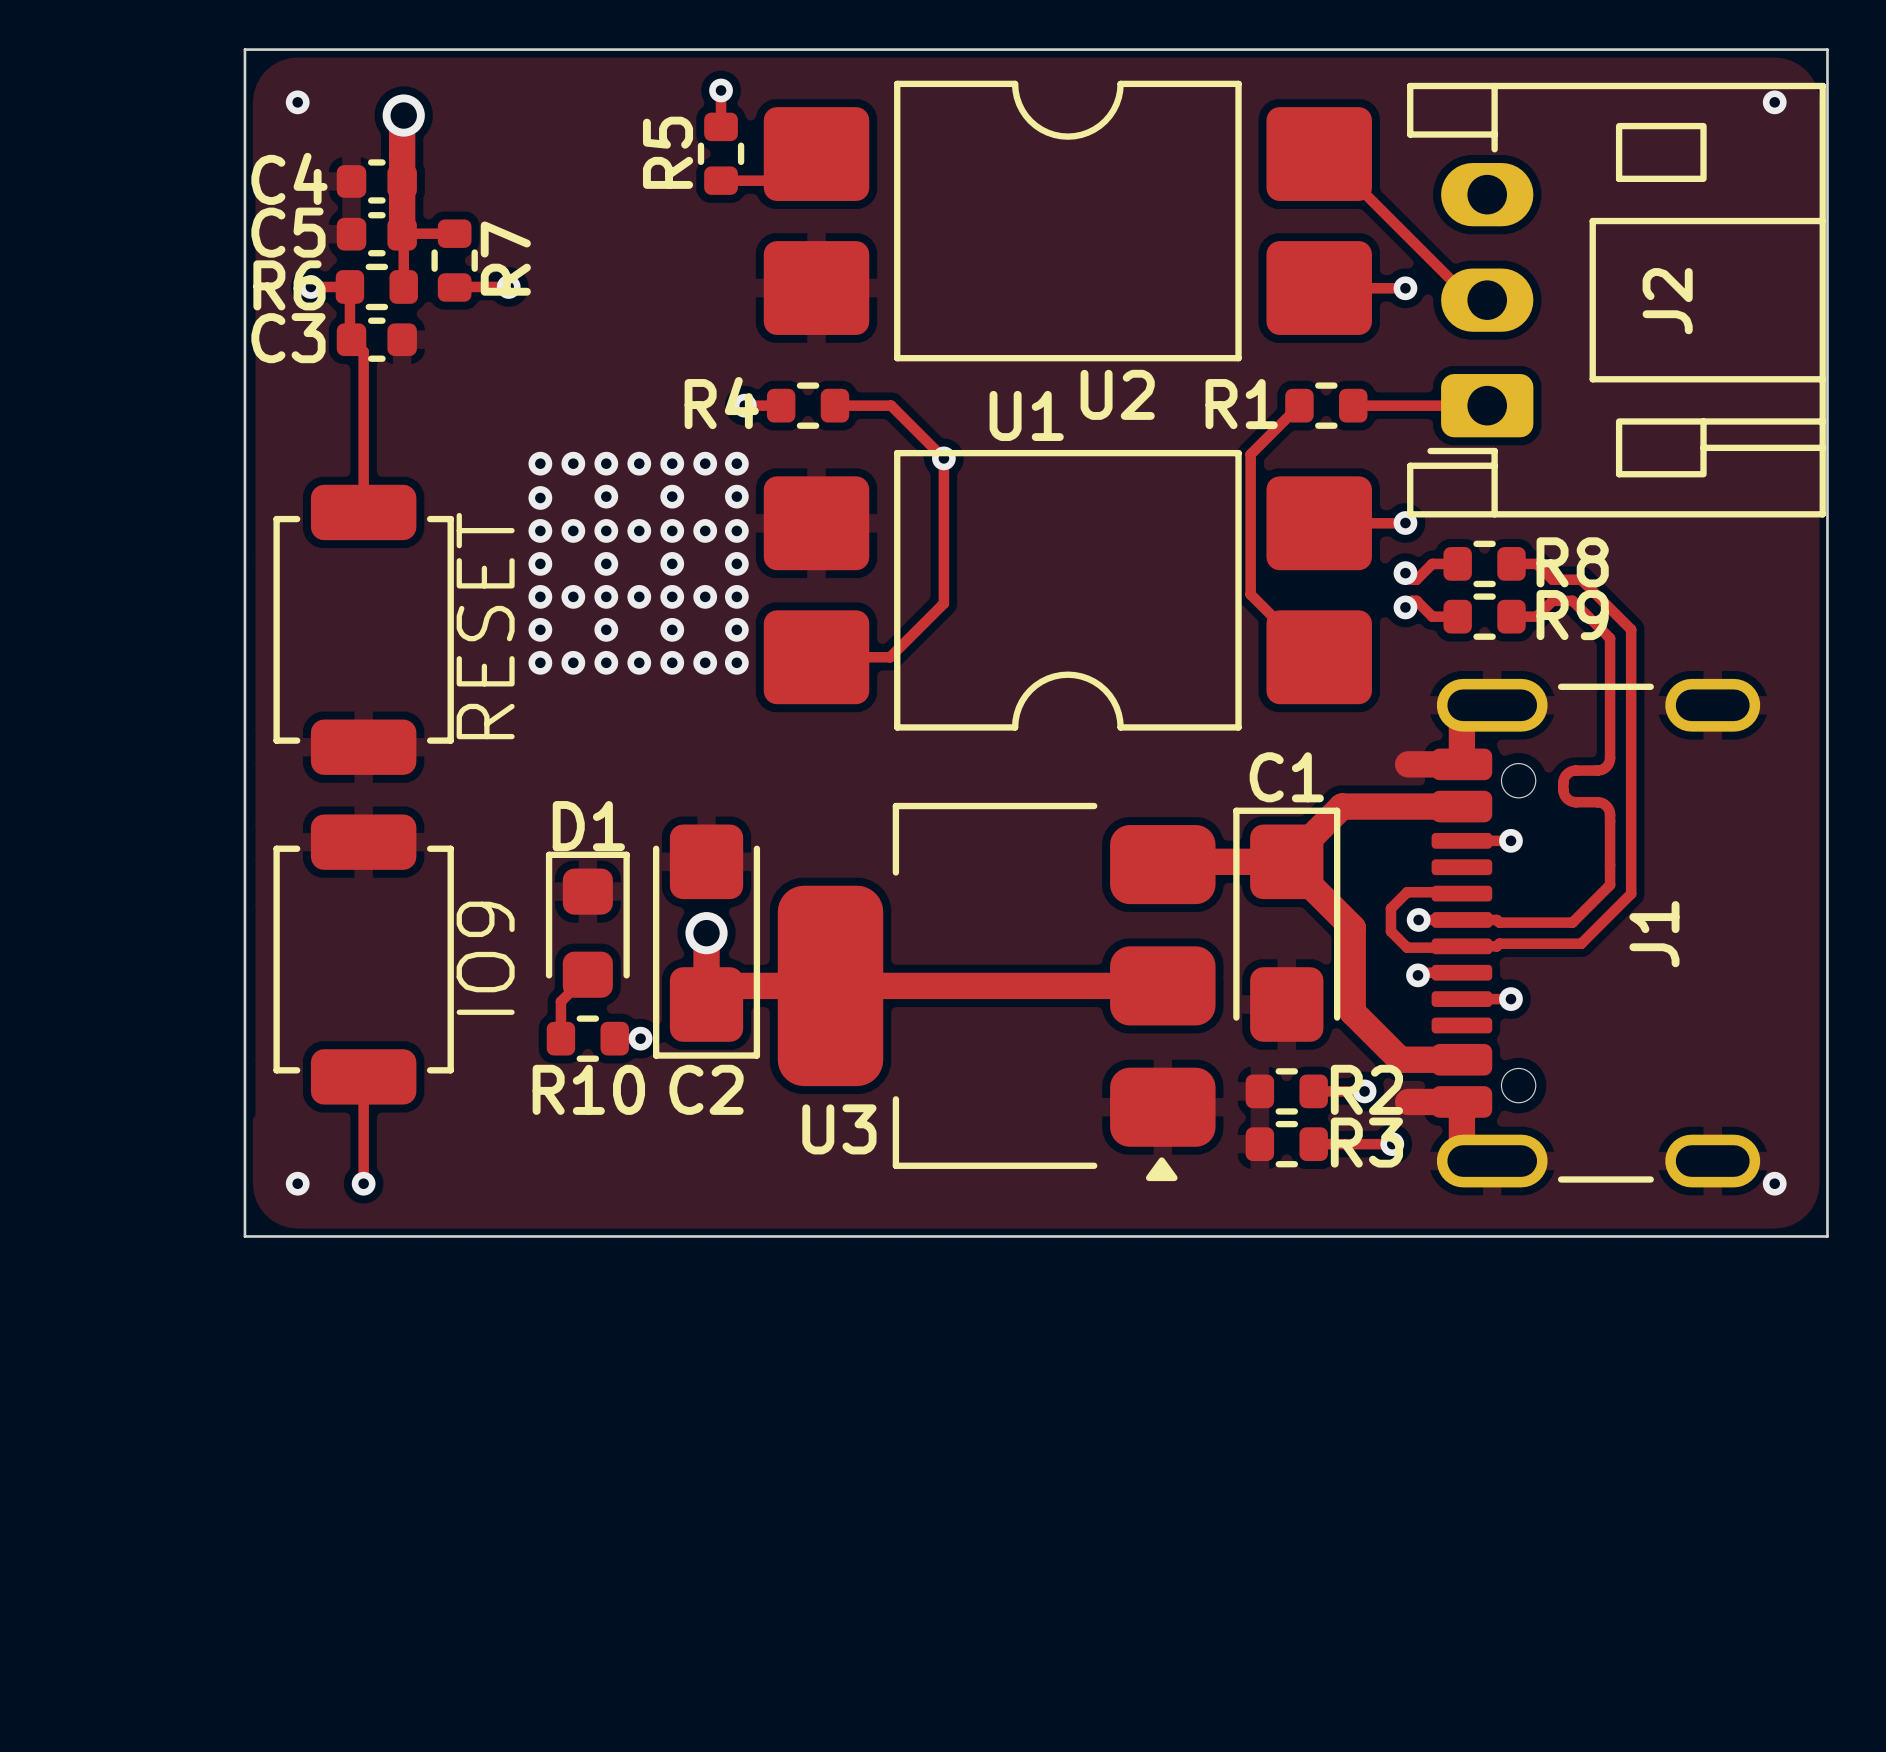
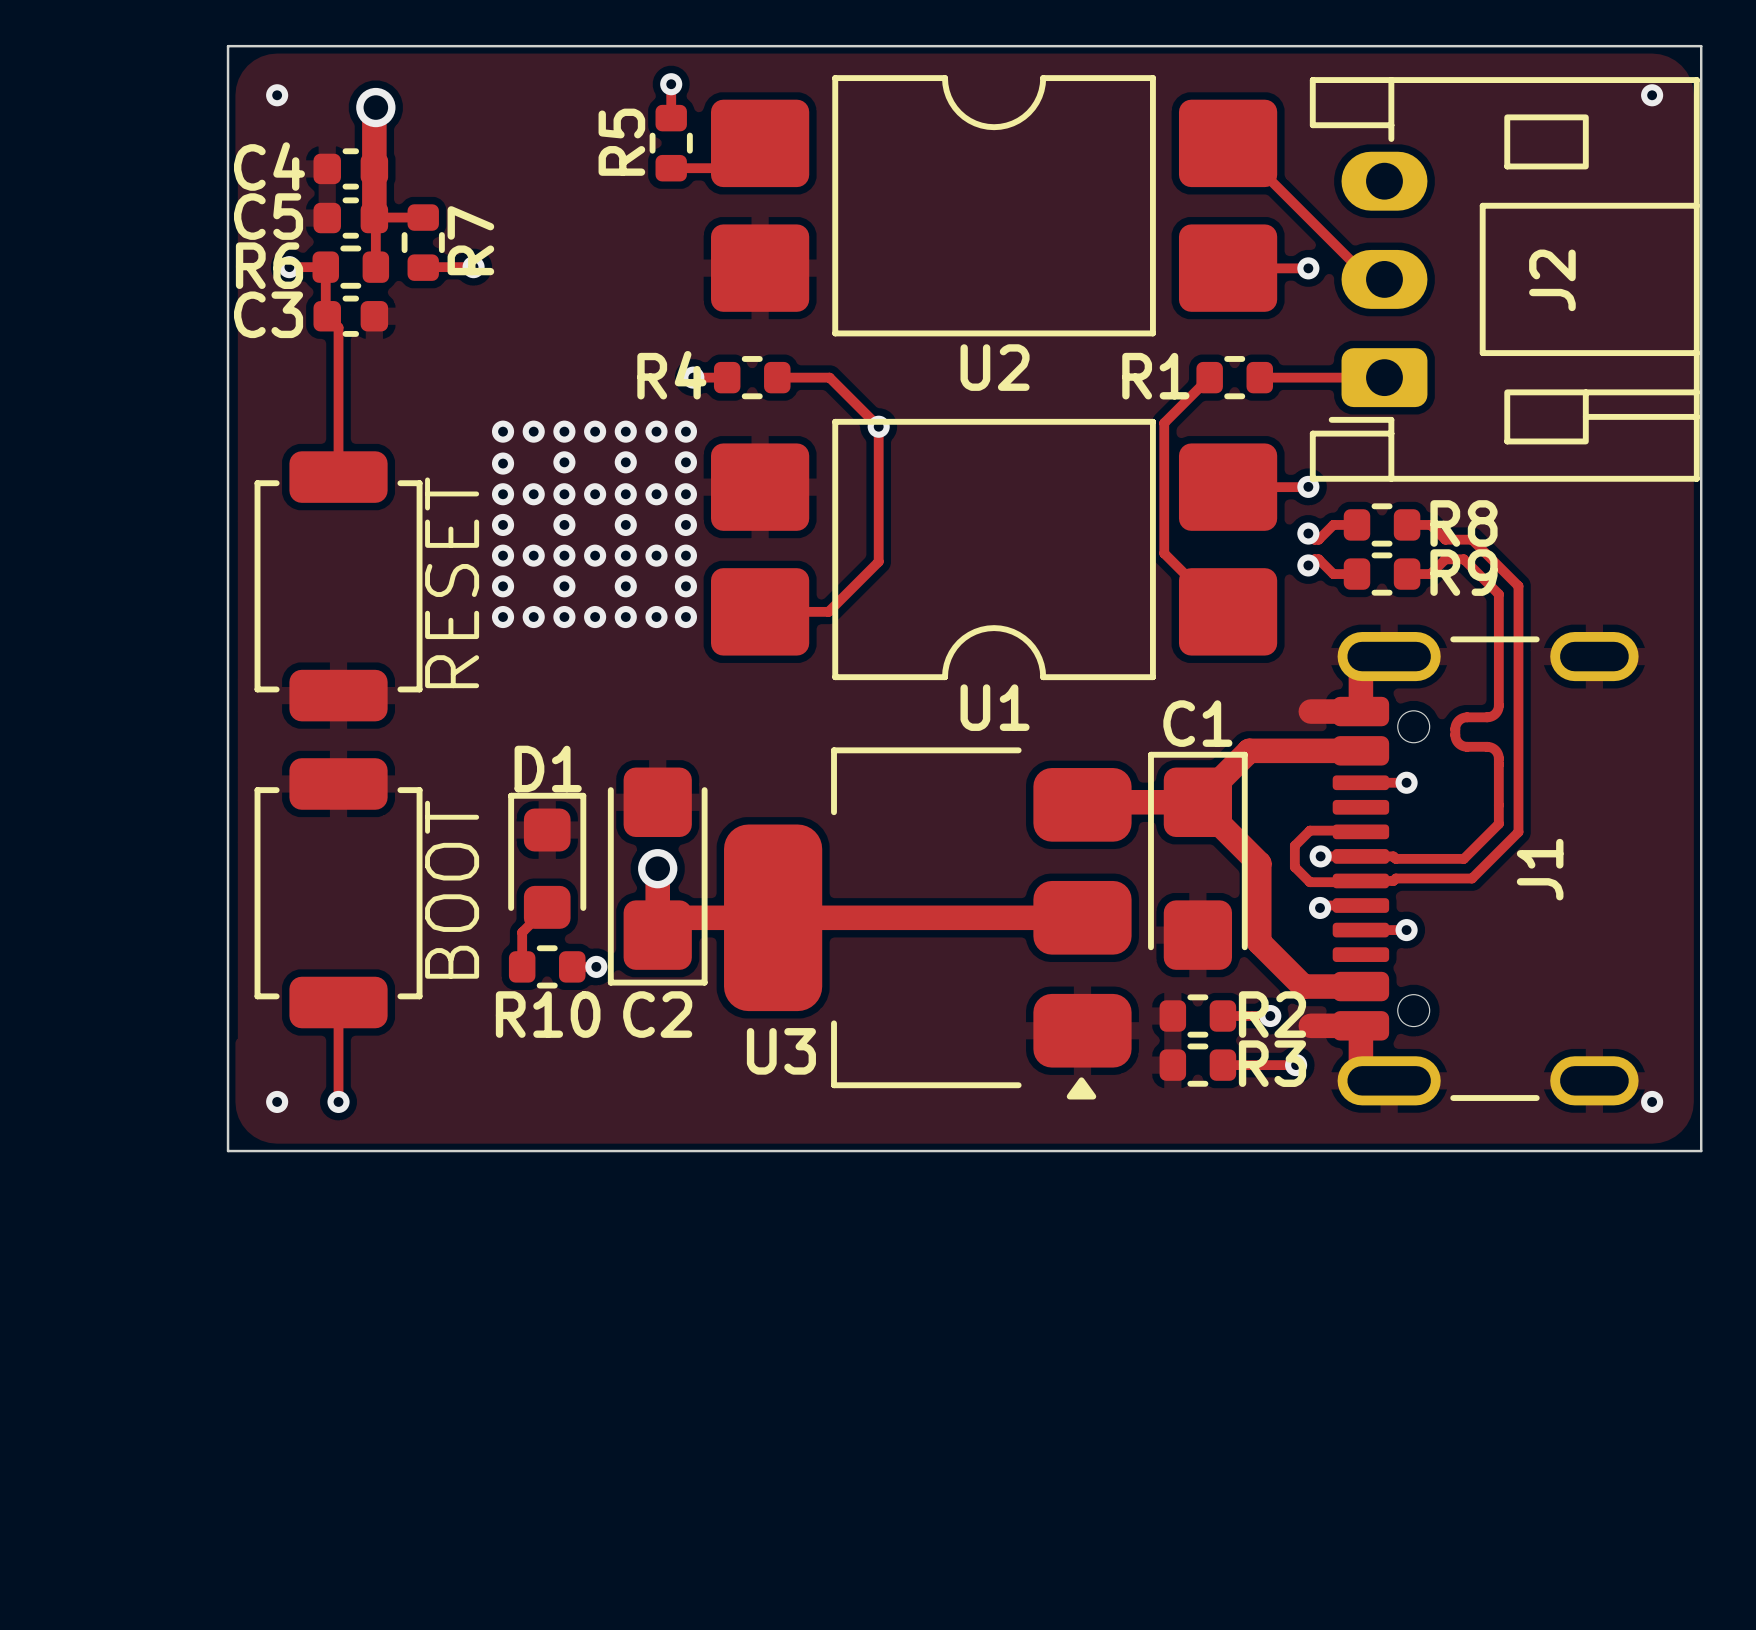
U2 name position: U2 (1117, 394) -> U2 (995, 367)
U1 name position: U1 (1026, 415) -> U1 (995, 707)
text: IO9 (485, 958) -> BOOT (452, 889)

